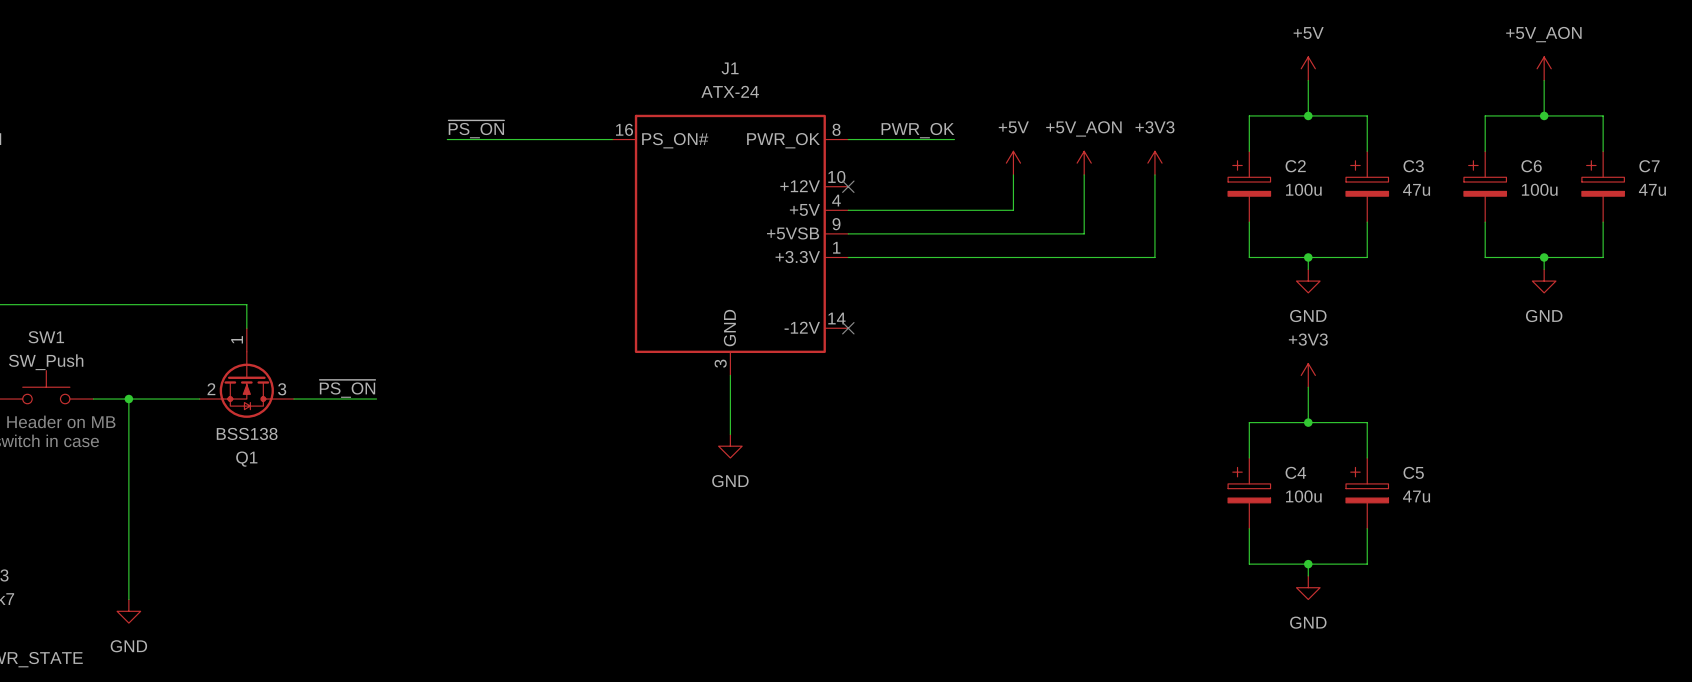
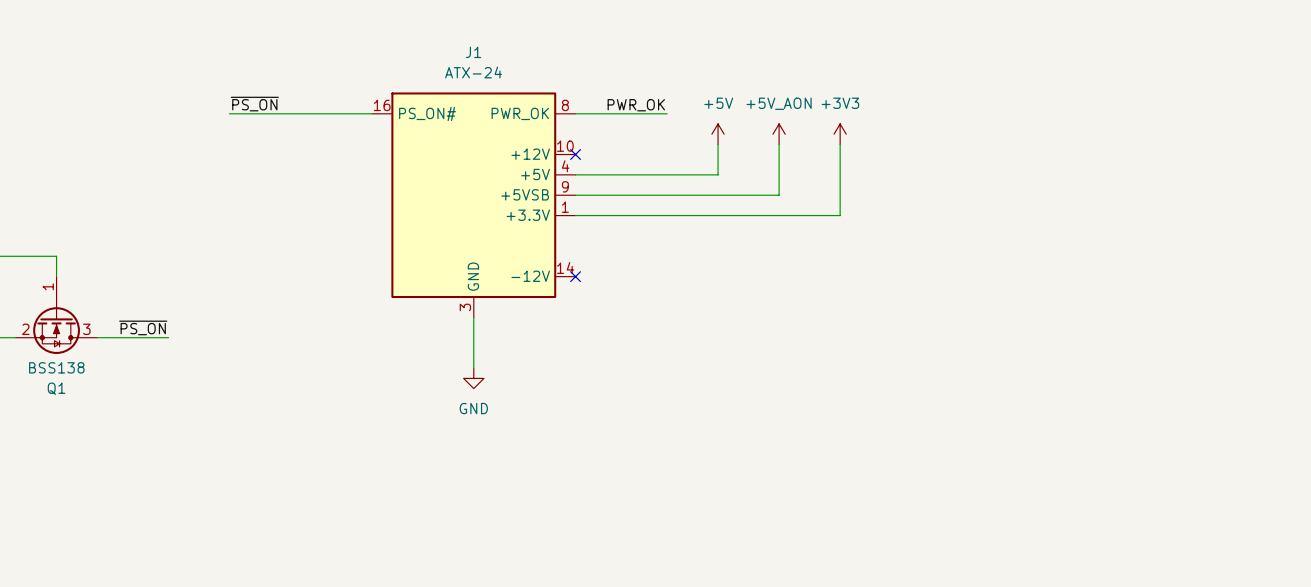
power symbol: +5V (1308, 68) -> none
power symbol: +5V_AON (1544, 68) -> none
wire: (1308, 80) (1308, 115) -> none
wire: (1544, 80) (1544, 115) -> none
junction: (1308, 115) -> none
junction: (1544, 115) -> none
wire: (1249, 151) (1249, 115) (1367, 115) (1367, 151) -> none
wire: (1485, 151) (1485, 115) (1603, 115) (1603, 151) -> none
C2: 100u (1249, 186) -> none
C3: 47u (1367, 186) -> none
C6: 100u (1485, 186) -> none
C7: 47u (1603, 186) -> none
wire: (1249, 222) (1249, 257) (1367, 257) (1367, 222) -> none
wire: (1485, 222) (1485, 257) (1603, 257) (1603, 222) -> none
wire: (1308, 257) (1308, 269) -> none
junction: (1308, 257) -> none
wire: (1544, 257) (1544, 269) -> none
junction: (1544, 257) -> none
power symbol: GND (1308, 281) -> none
power symbol: GND (1544, 281) -> none
power symbol: +3V3 (1308, 375) -> none
wire: (1308, 387) (1308, 422) -> none
junction: (1308, 422) -> none
wire: (1249, 457) (1249, 422) (1367, 422) (1367, 457) -> none
C4: 100u (1249, 493) -> none
C5: 47u (1367, 493) -> none
wire: (1249, 528) (1249, 564) (1367, 564) (1367, 528) -> none
wire: (1308, 564) (1308, 575) -> none
junction: (1308, 564) -> none
power symbol: GND (1308, 587) -> none

